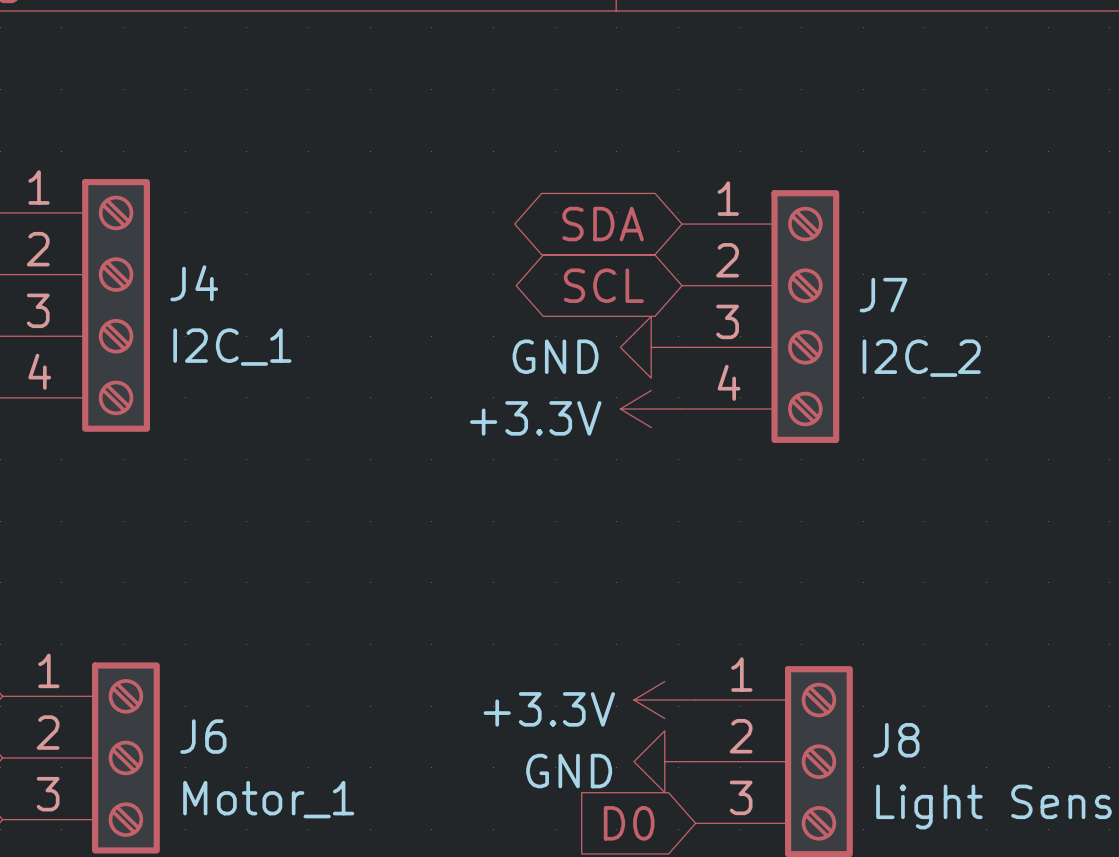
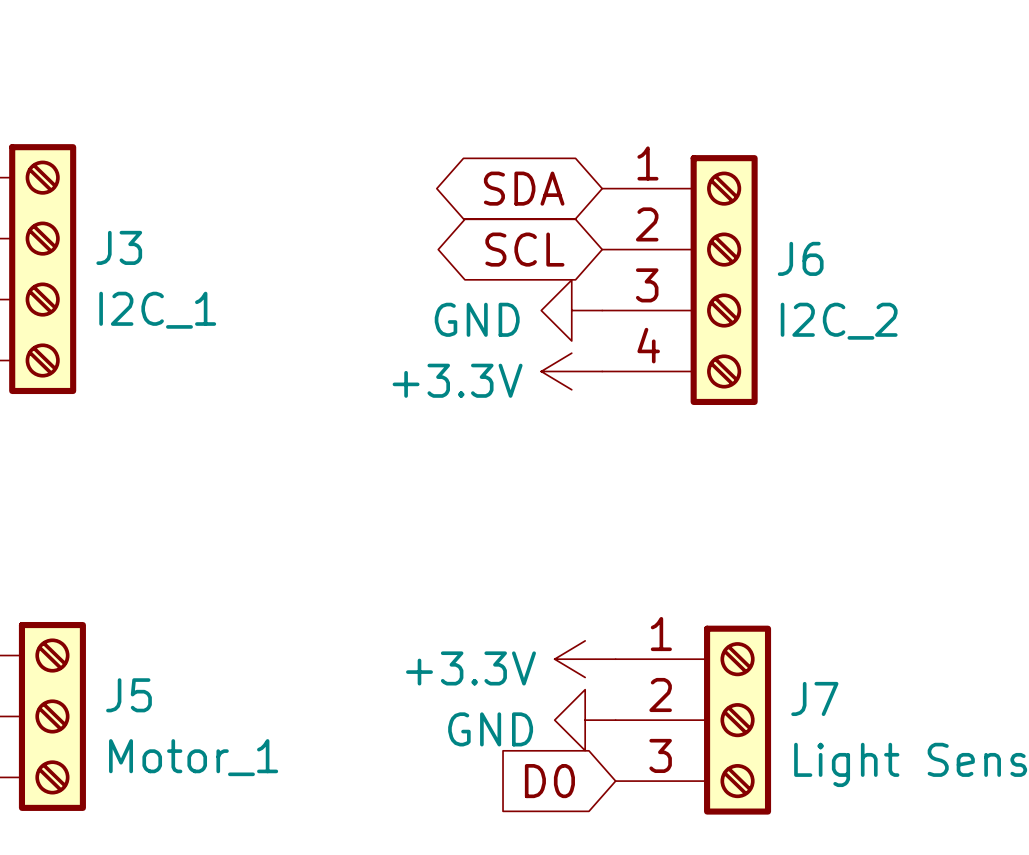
J4 name: J4 (194, 283) -> J3 (119, 247)
J7 name: J7 (883, 295) -> J6 (800, 258)
J6 name: J6 (203, 736) -> J5 (129, 695)
J8 name: J8 (896, 740) -> J7 (814, 698)

